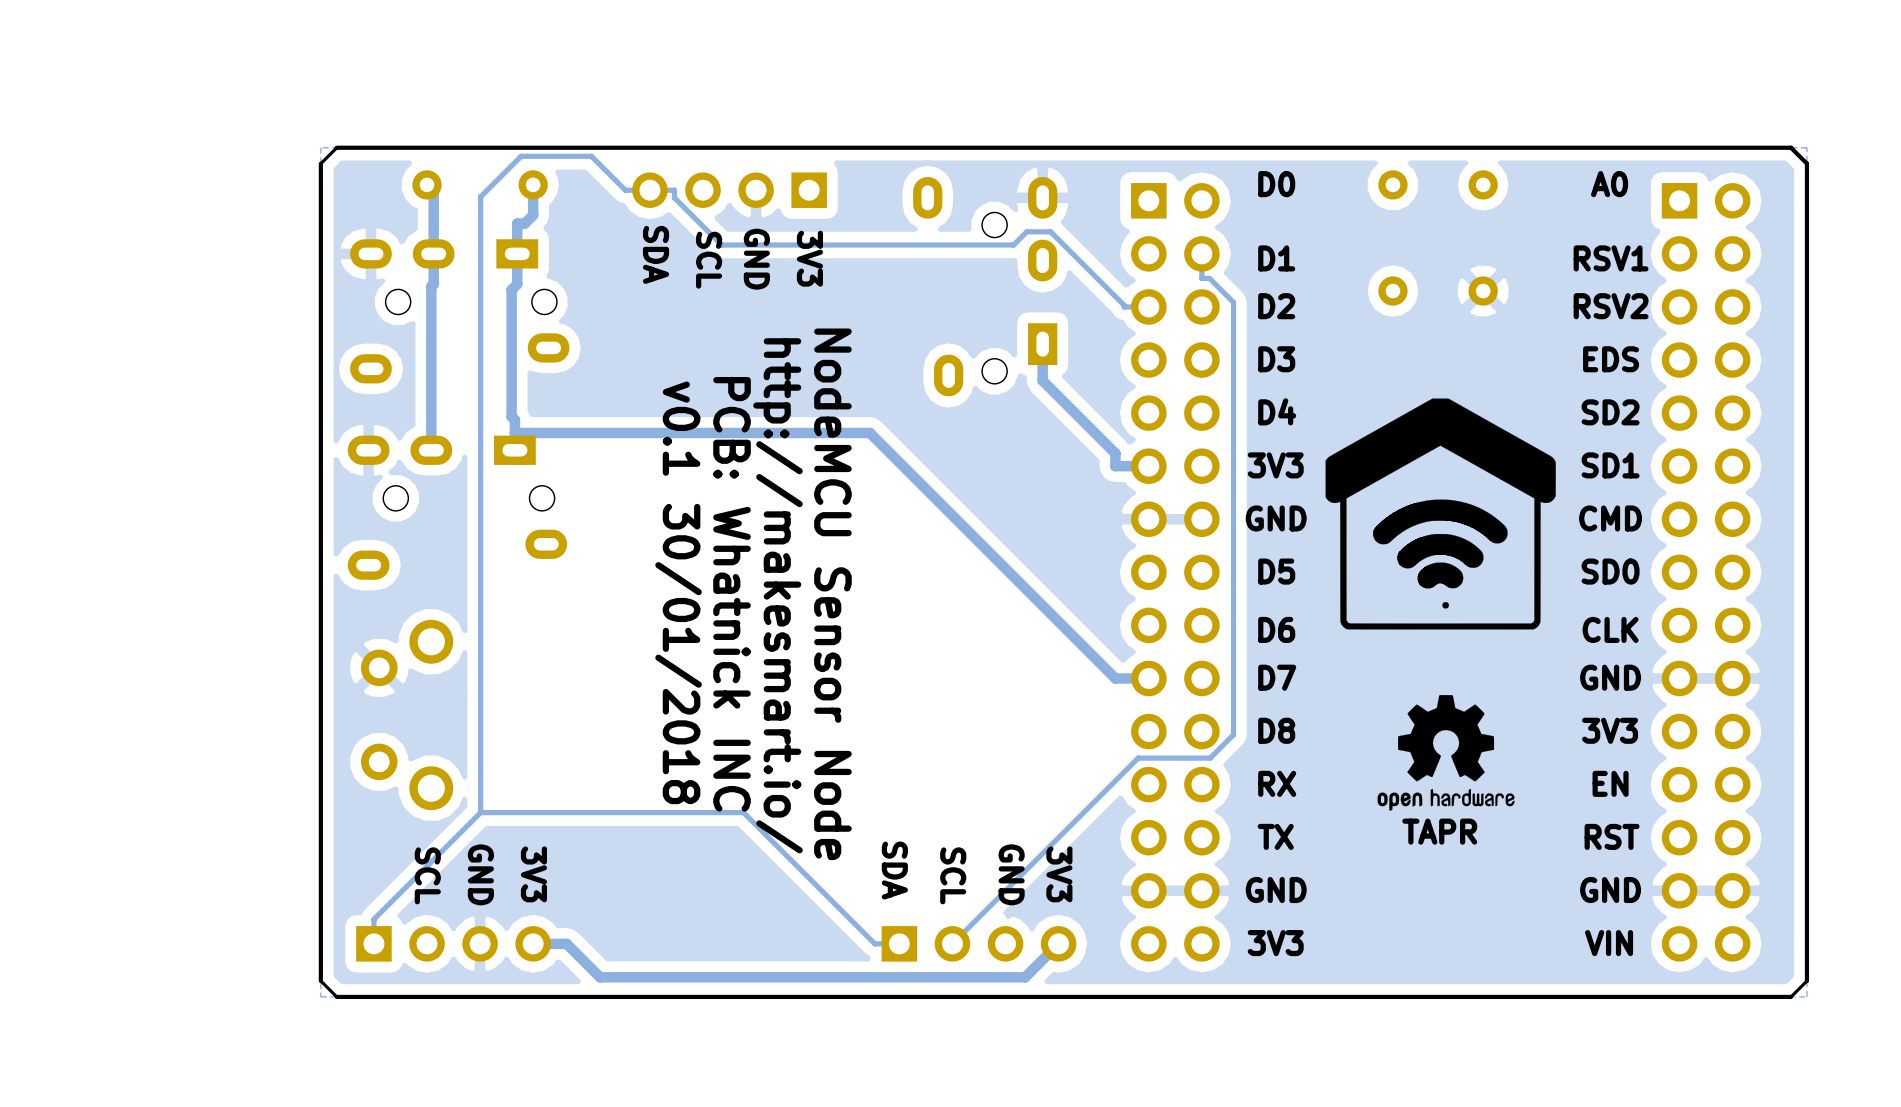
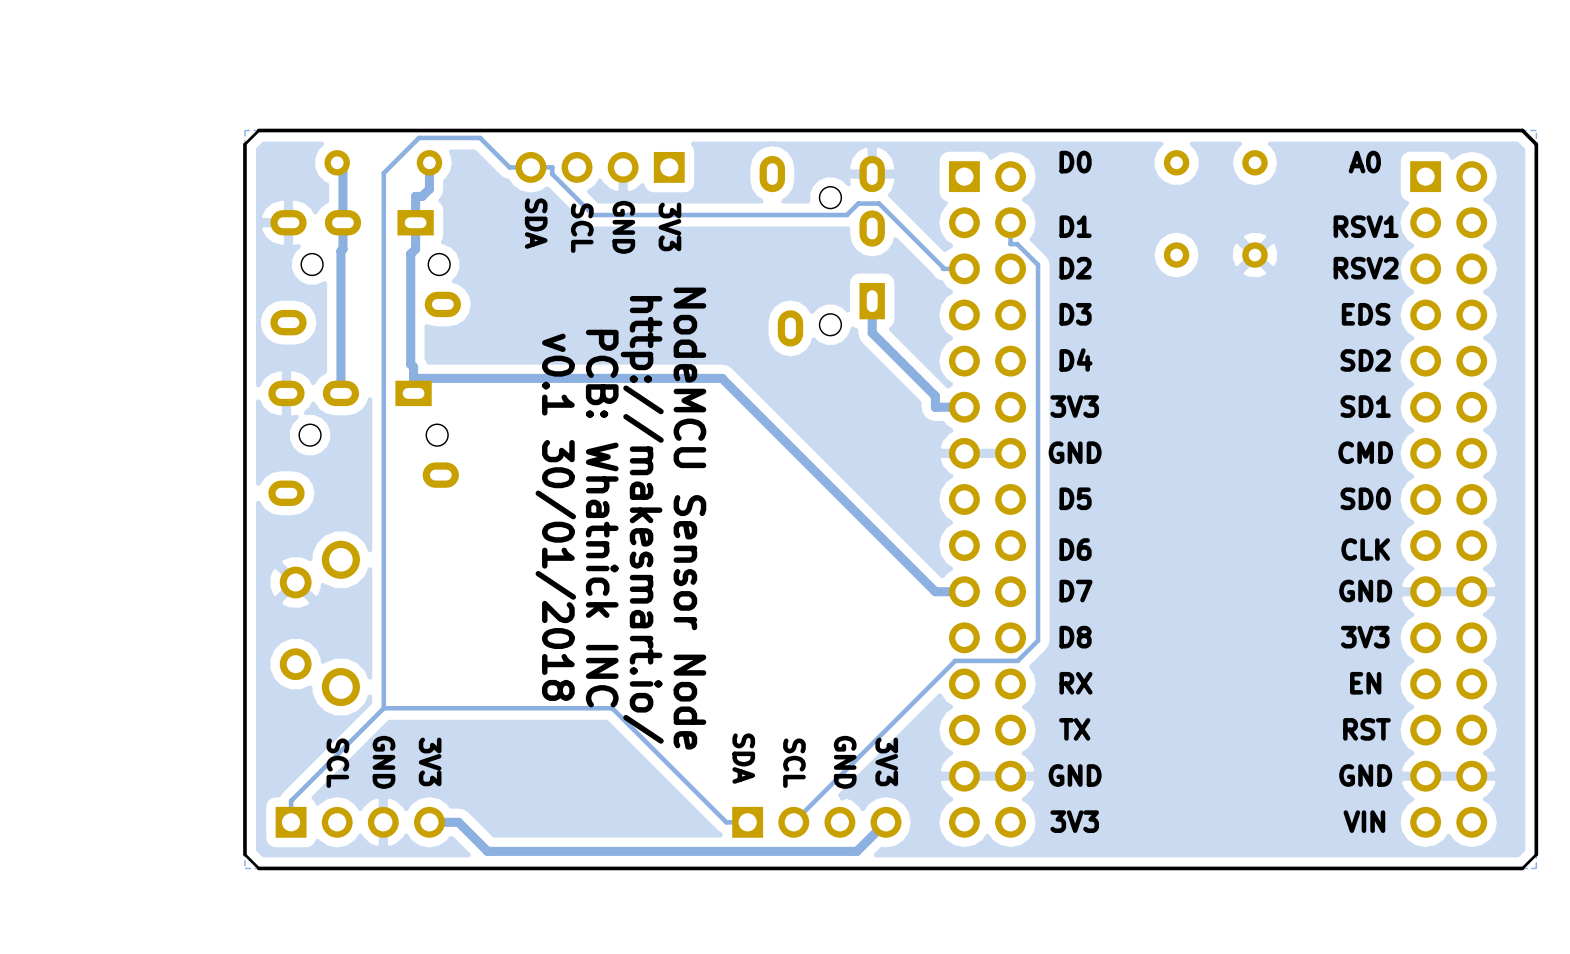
drawing: [1325, 398, 1556, 630] -> none
drawing: [1377, 695, 1515, 811] -> none
text: TAPR (1439, 831) -> none

